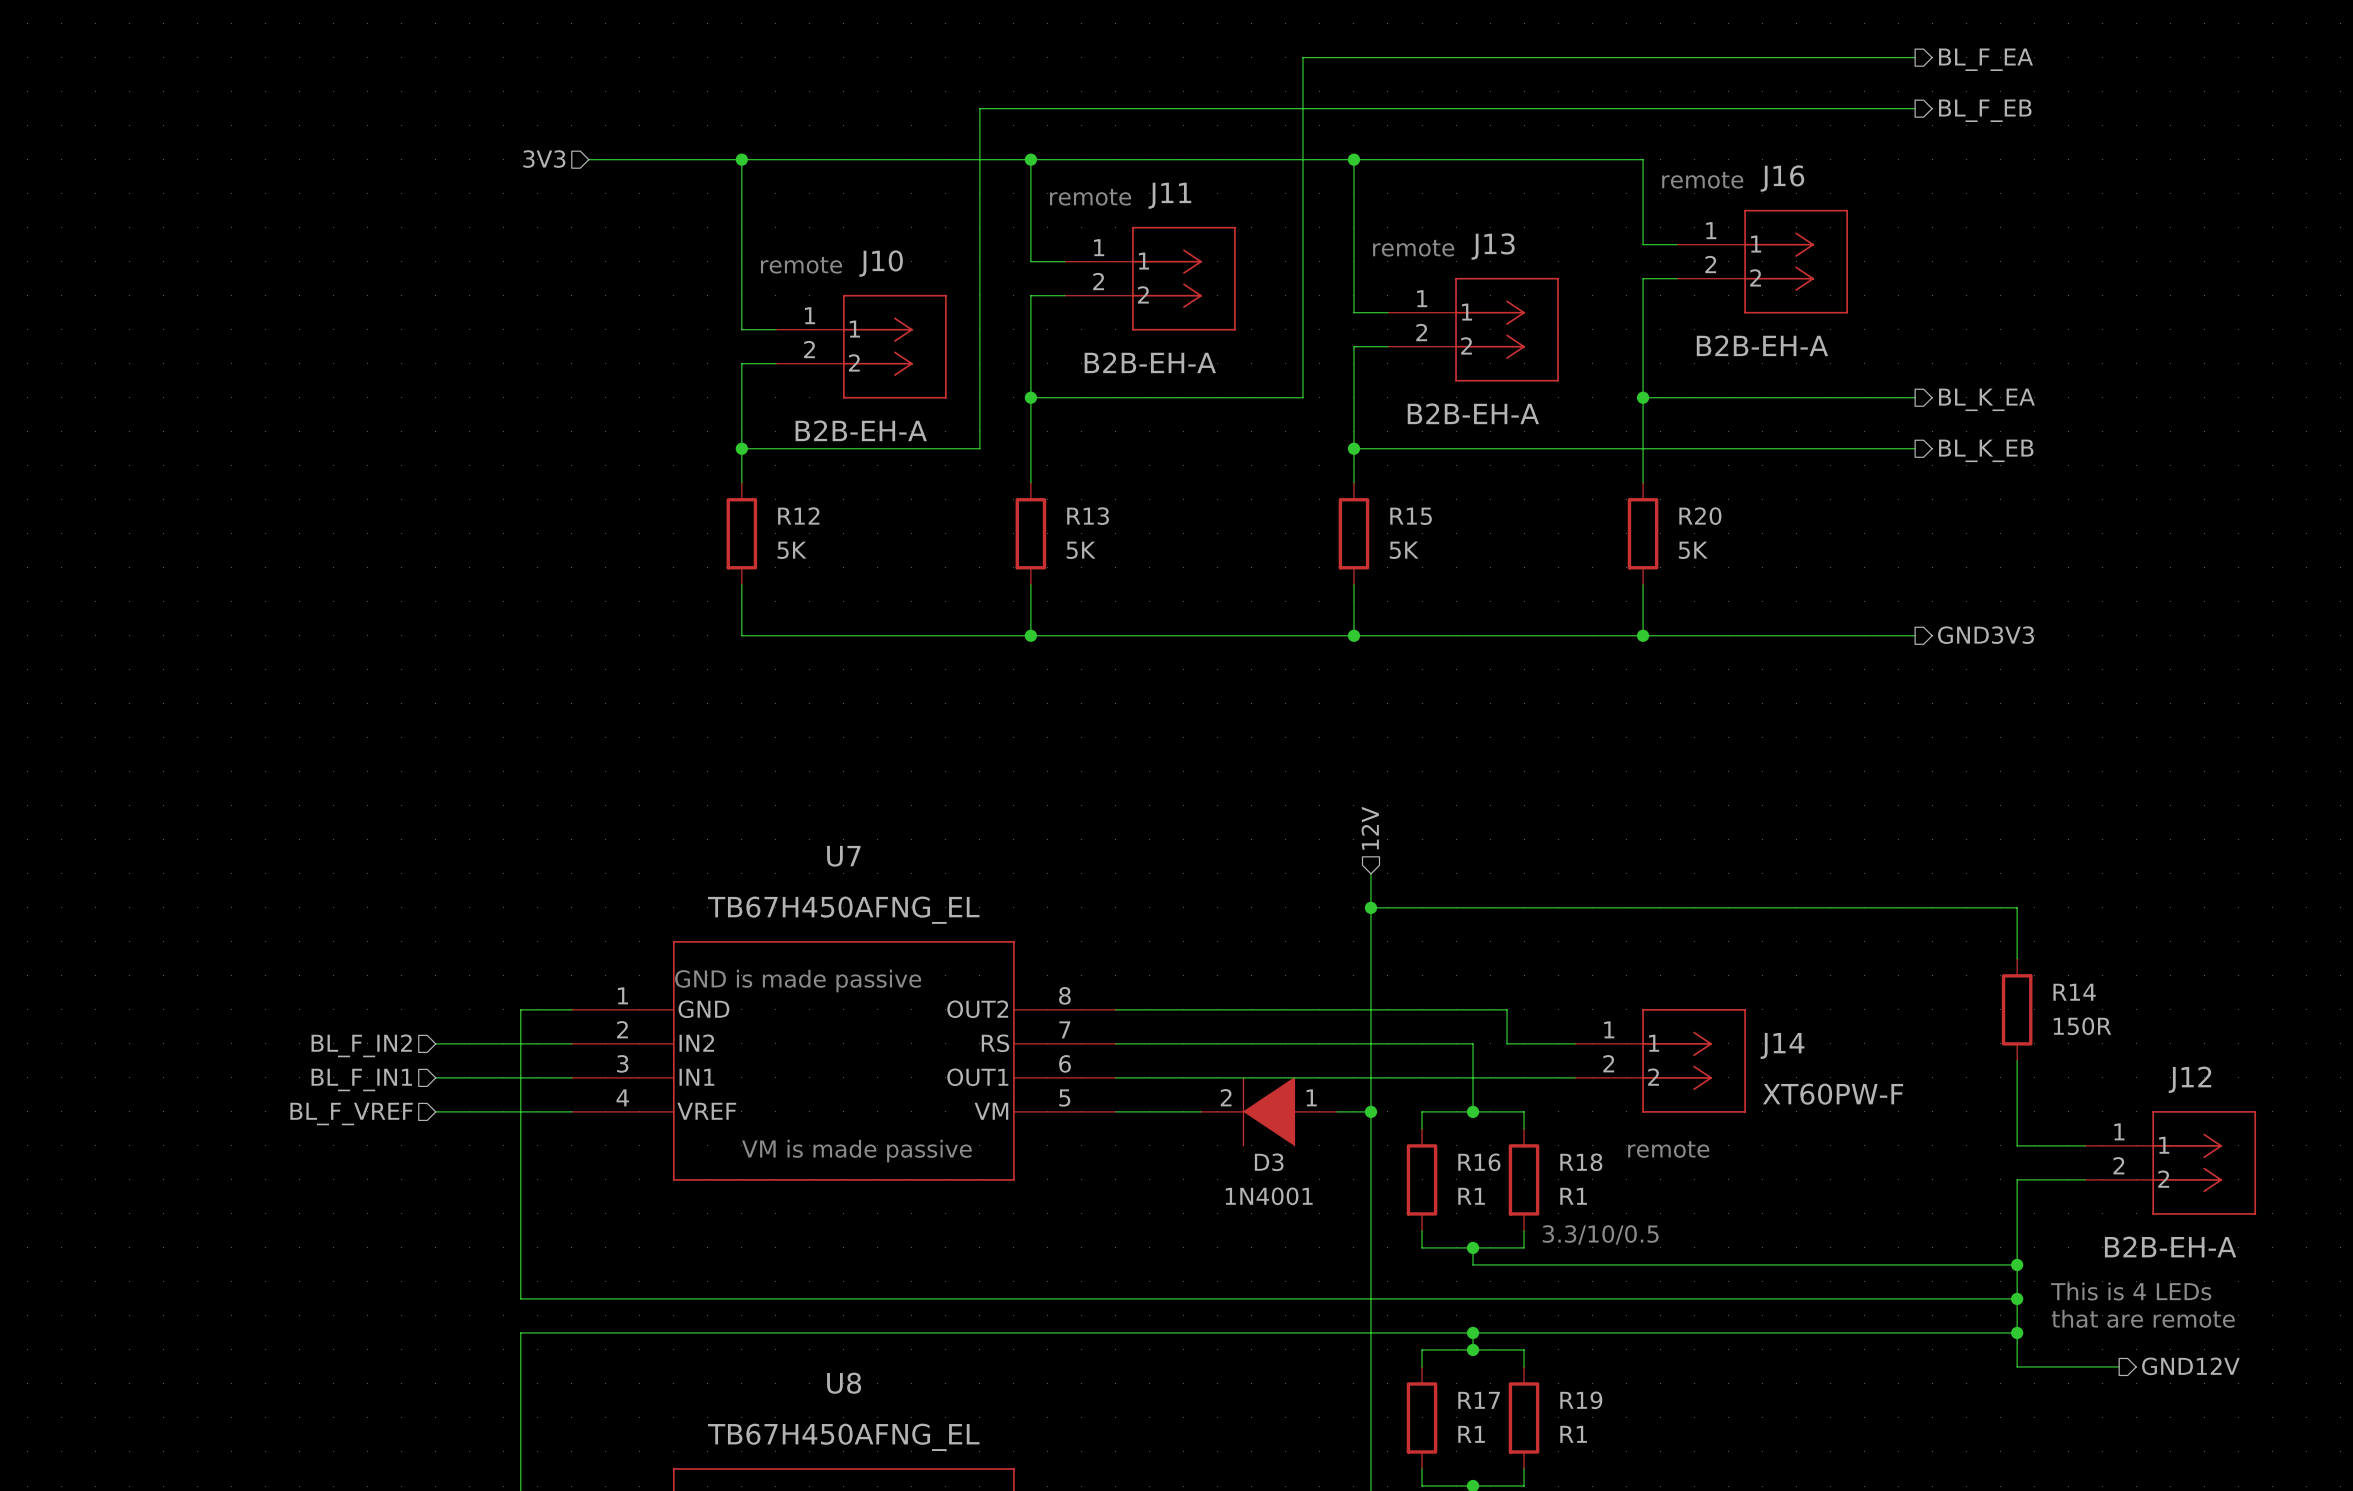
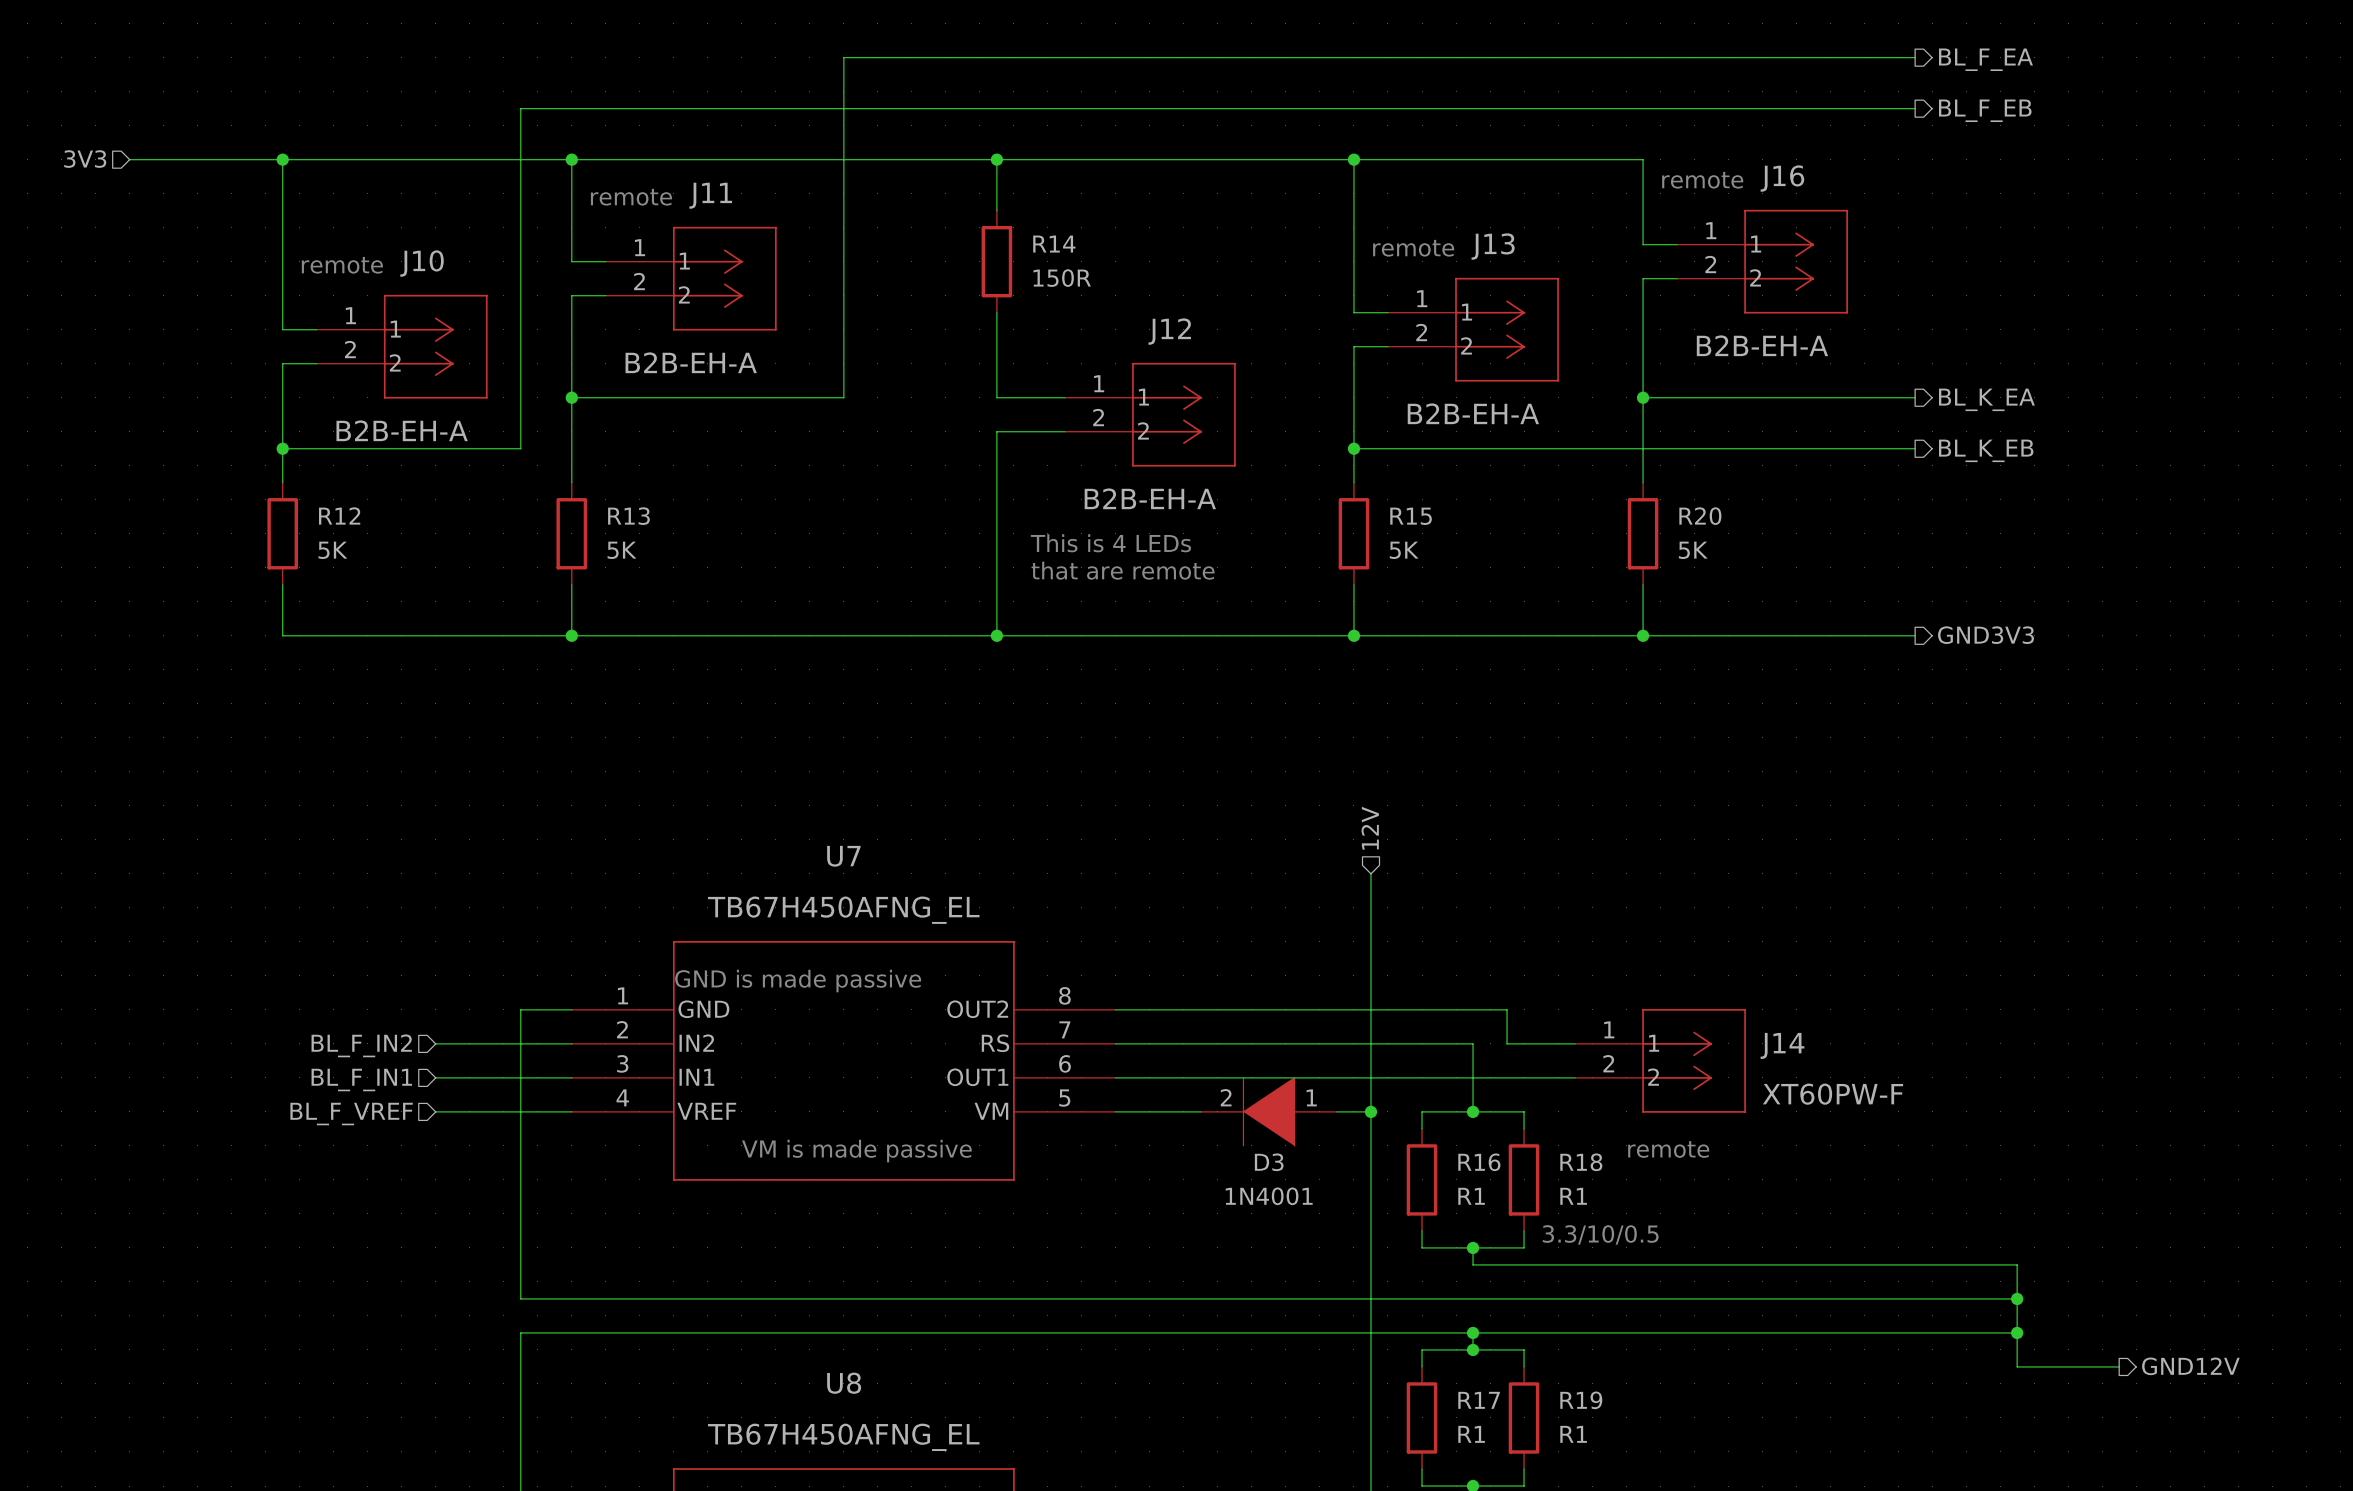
wire: (1302, 57) (1302, 397) (1064, 397) -> (1302, 57) (843, 57) (843, 397) (571, 397)
wire: (979, 108) (979, 448) (741, 448) -> (979, 108) (520, 108) (520, 448) (282, 448)
hierarchical label: none -> 3V3 (85, 159)
wire: none -> (129, 159) (588, 159)
wire: none -> (282, 159) (282, 329) (316, 329)
junction: none -> (282, 159)
hierarchical label: 3V3 (544, 159) -> none
wire: none -> (571, 159) (571, 261) (605, 261)
junction: none -> (571, 159)
wire: (741, 159) (741, 329) (775, 329) -> none
junction: (741, 159) -> none
wire: none -> (996, 159) (996, 210)
wire: (1030, 159) (1030, 261) (1064, 261) -> none
junction position: (1030, 159) -> (996, 159)
text: remote (1090, 197) -> none
text: none -> remote (342, 265)
text position: remote (801, 265) -> remote (631, 197)
J11 position: (1150, 278) -> (691, 278)
wire: none -> (605, 295) (571, 295) (571, 482)
wire: (1064, 295) (1030, 295) (1030, 482) -> none
wire: none -> (996, 312) (996, 397) (1030, 397)
J10 position: (861, 346) -> (402, 346)
wire: none -> (316, 363) (282, 363) (282, 482)
wire: (775, 363) (741, 363) (741, 482) -> none
junction: none -> (571, 397)
junction: (1030, 397) -> none
wire: none -> (1064, 431) (996, 431) (996, 635)
junction: none -> (282, 448)
junction: (741, 448) -> none
R12 position: (741, 533) -> (282, 533)
R13 position: (1030, 533) -> (571, 533)
text: none -> This is 4 LEDs (1110, 543)
text: none -> that are remote (1123, 570)
wire: none -> (571, 584) (571, 635)
wire: (741, 584) (741, 635) -> (282, 584) (282, 635) (741, 635)
wire: (1030, 584) (1030, 635) -> none
junction: none -> (571, 635)
junction position: (1030, 635) -> (996, 635)
wire: (1370, 907) (2017, 907) (2017, 958) -> none
junction: (1370, 907) -> none
R14 position: (2017, 1009) -> (996, 261)
wire: (2017, 1060) (2017, 1145) (2085, 1145) -> none
J12 position: (2170, 1162) -> (1150, 414)
wire: (2085, 1179) (2017, 1179) (2017, 1264) -> none
junction: (2017, 1264) -> none
text: This is 4 LEDs (2131, 1291) -> none
text: that are remote (2143, 1318) -> none

